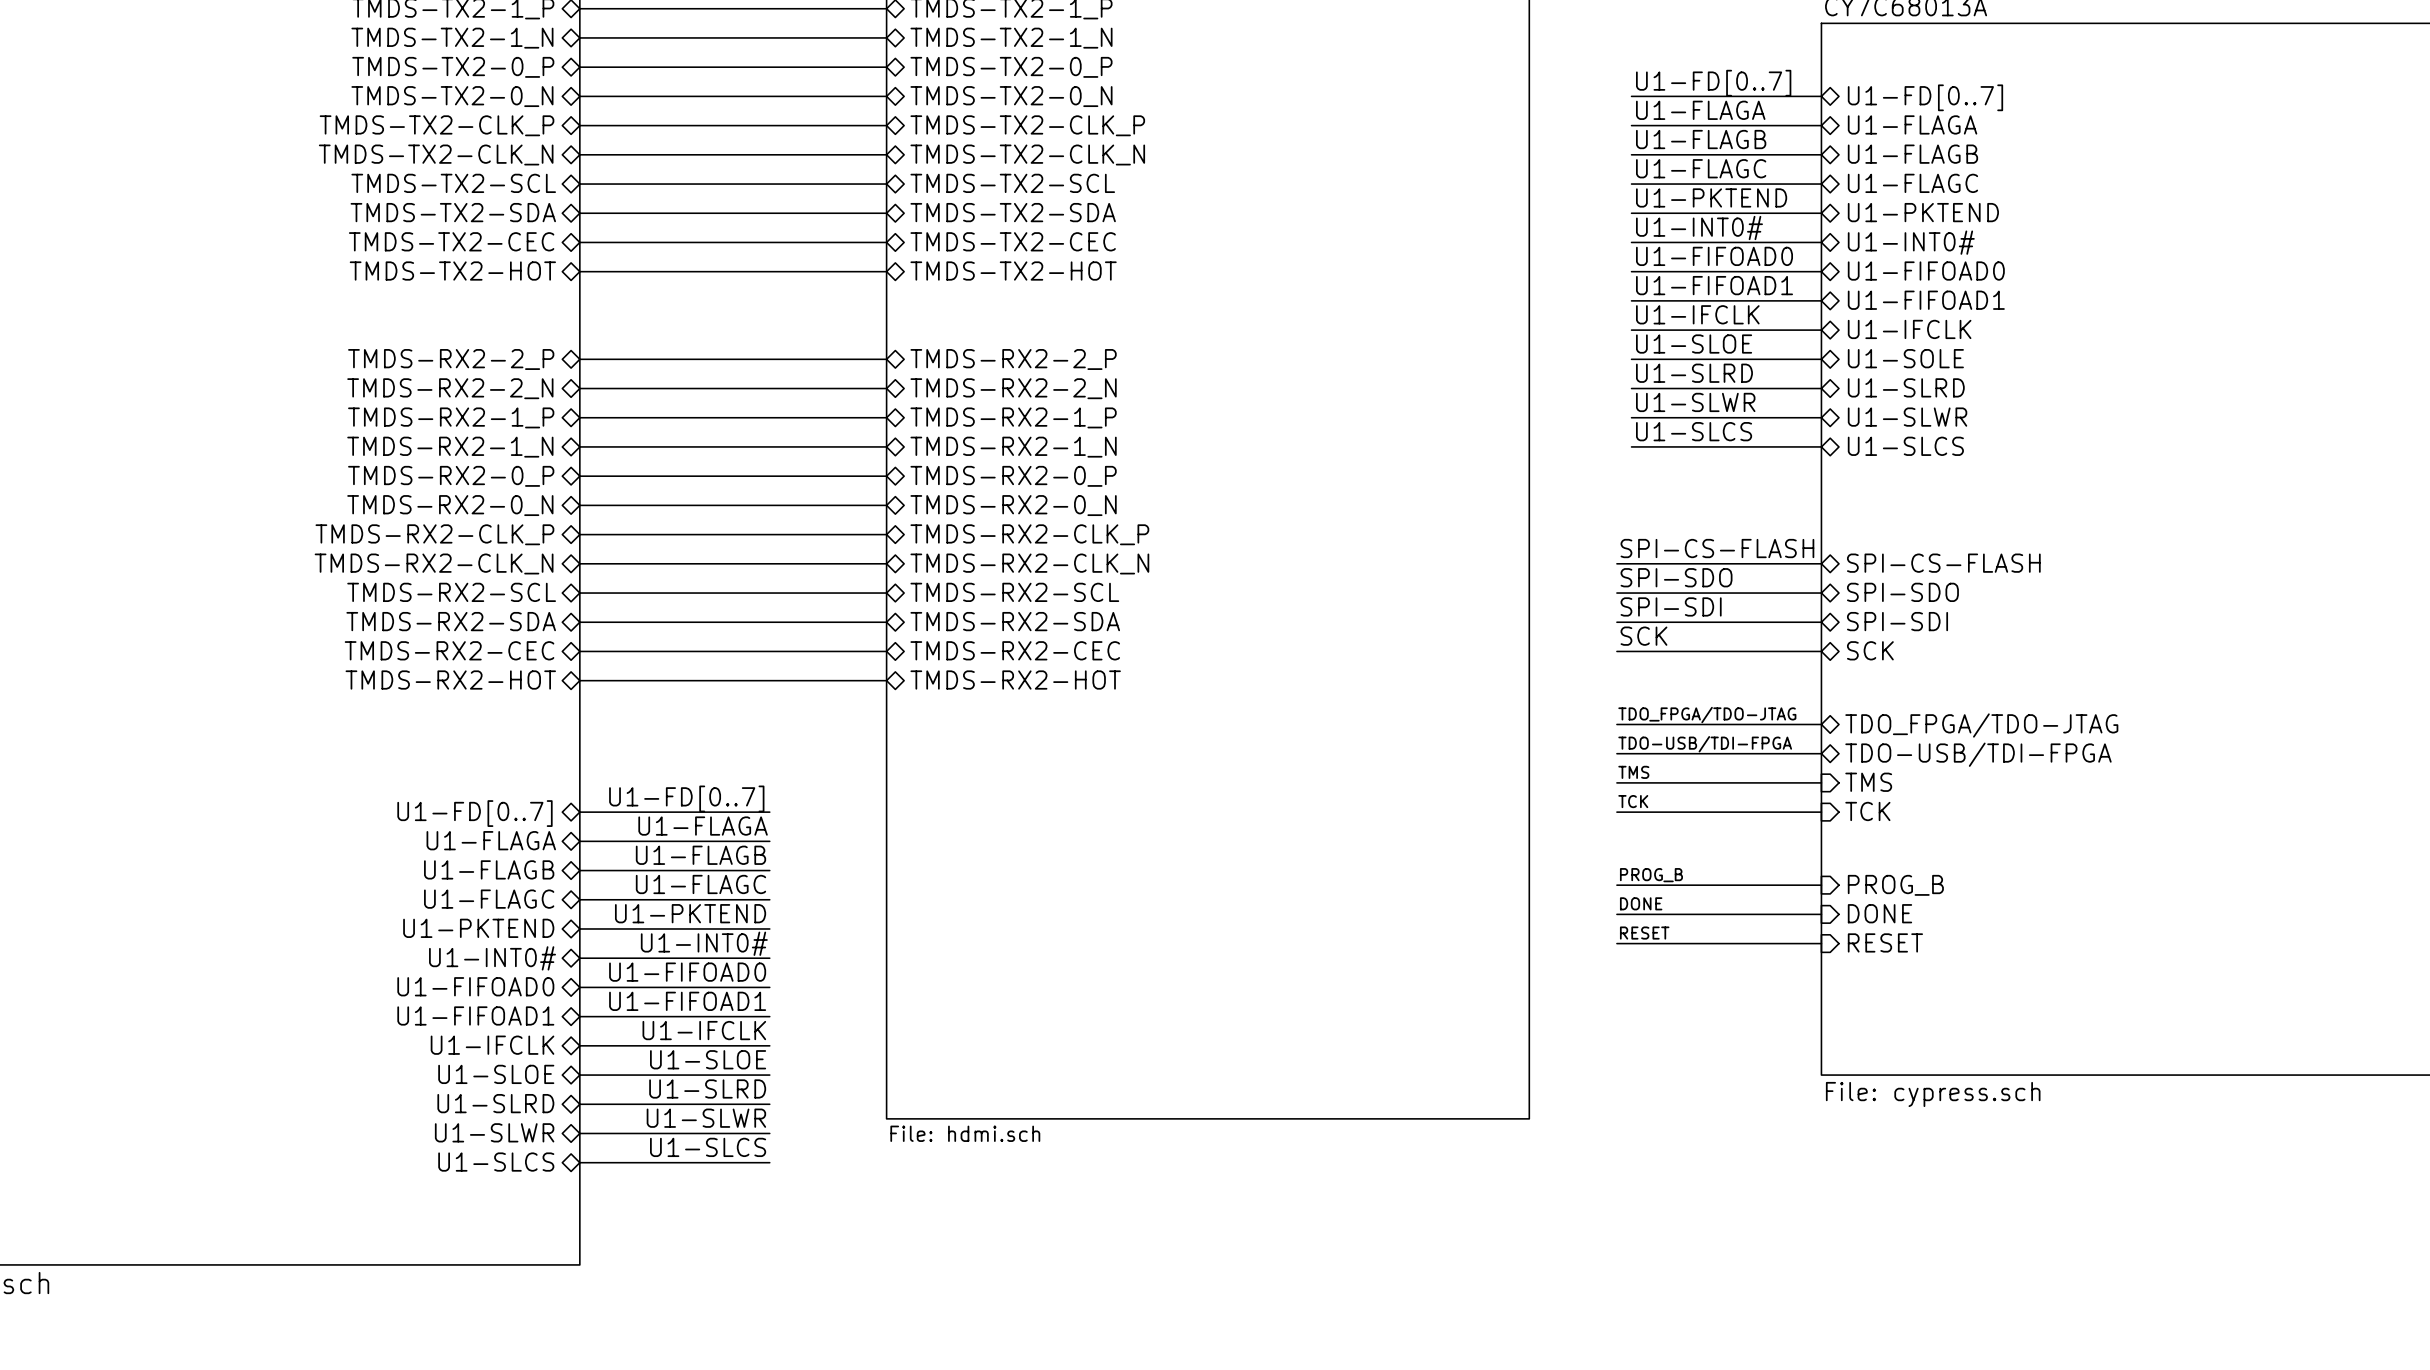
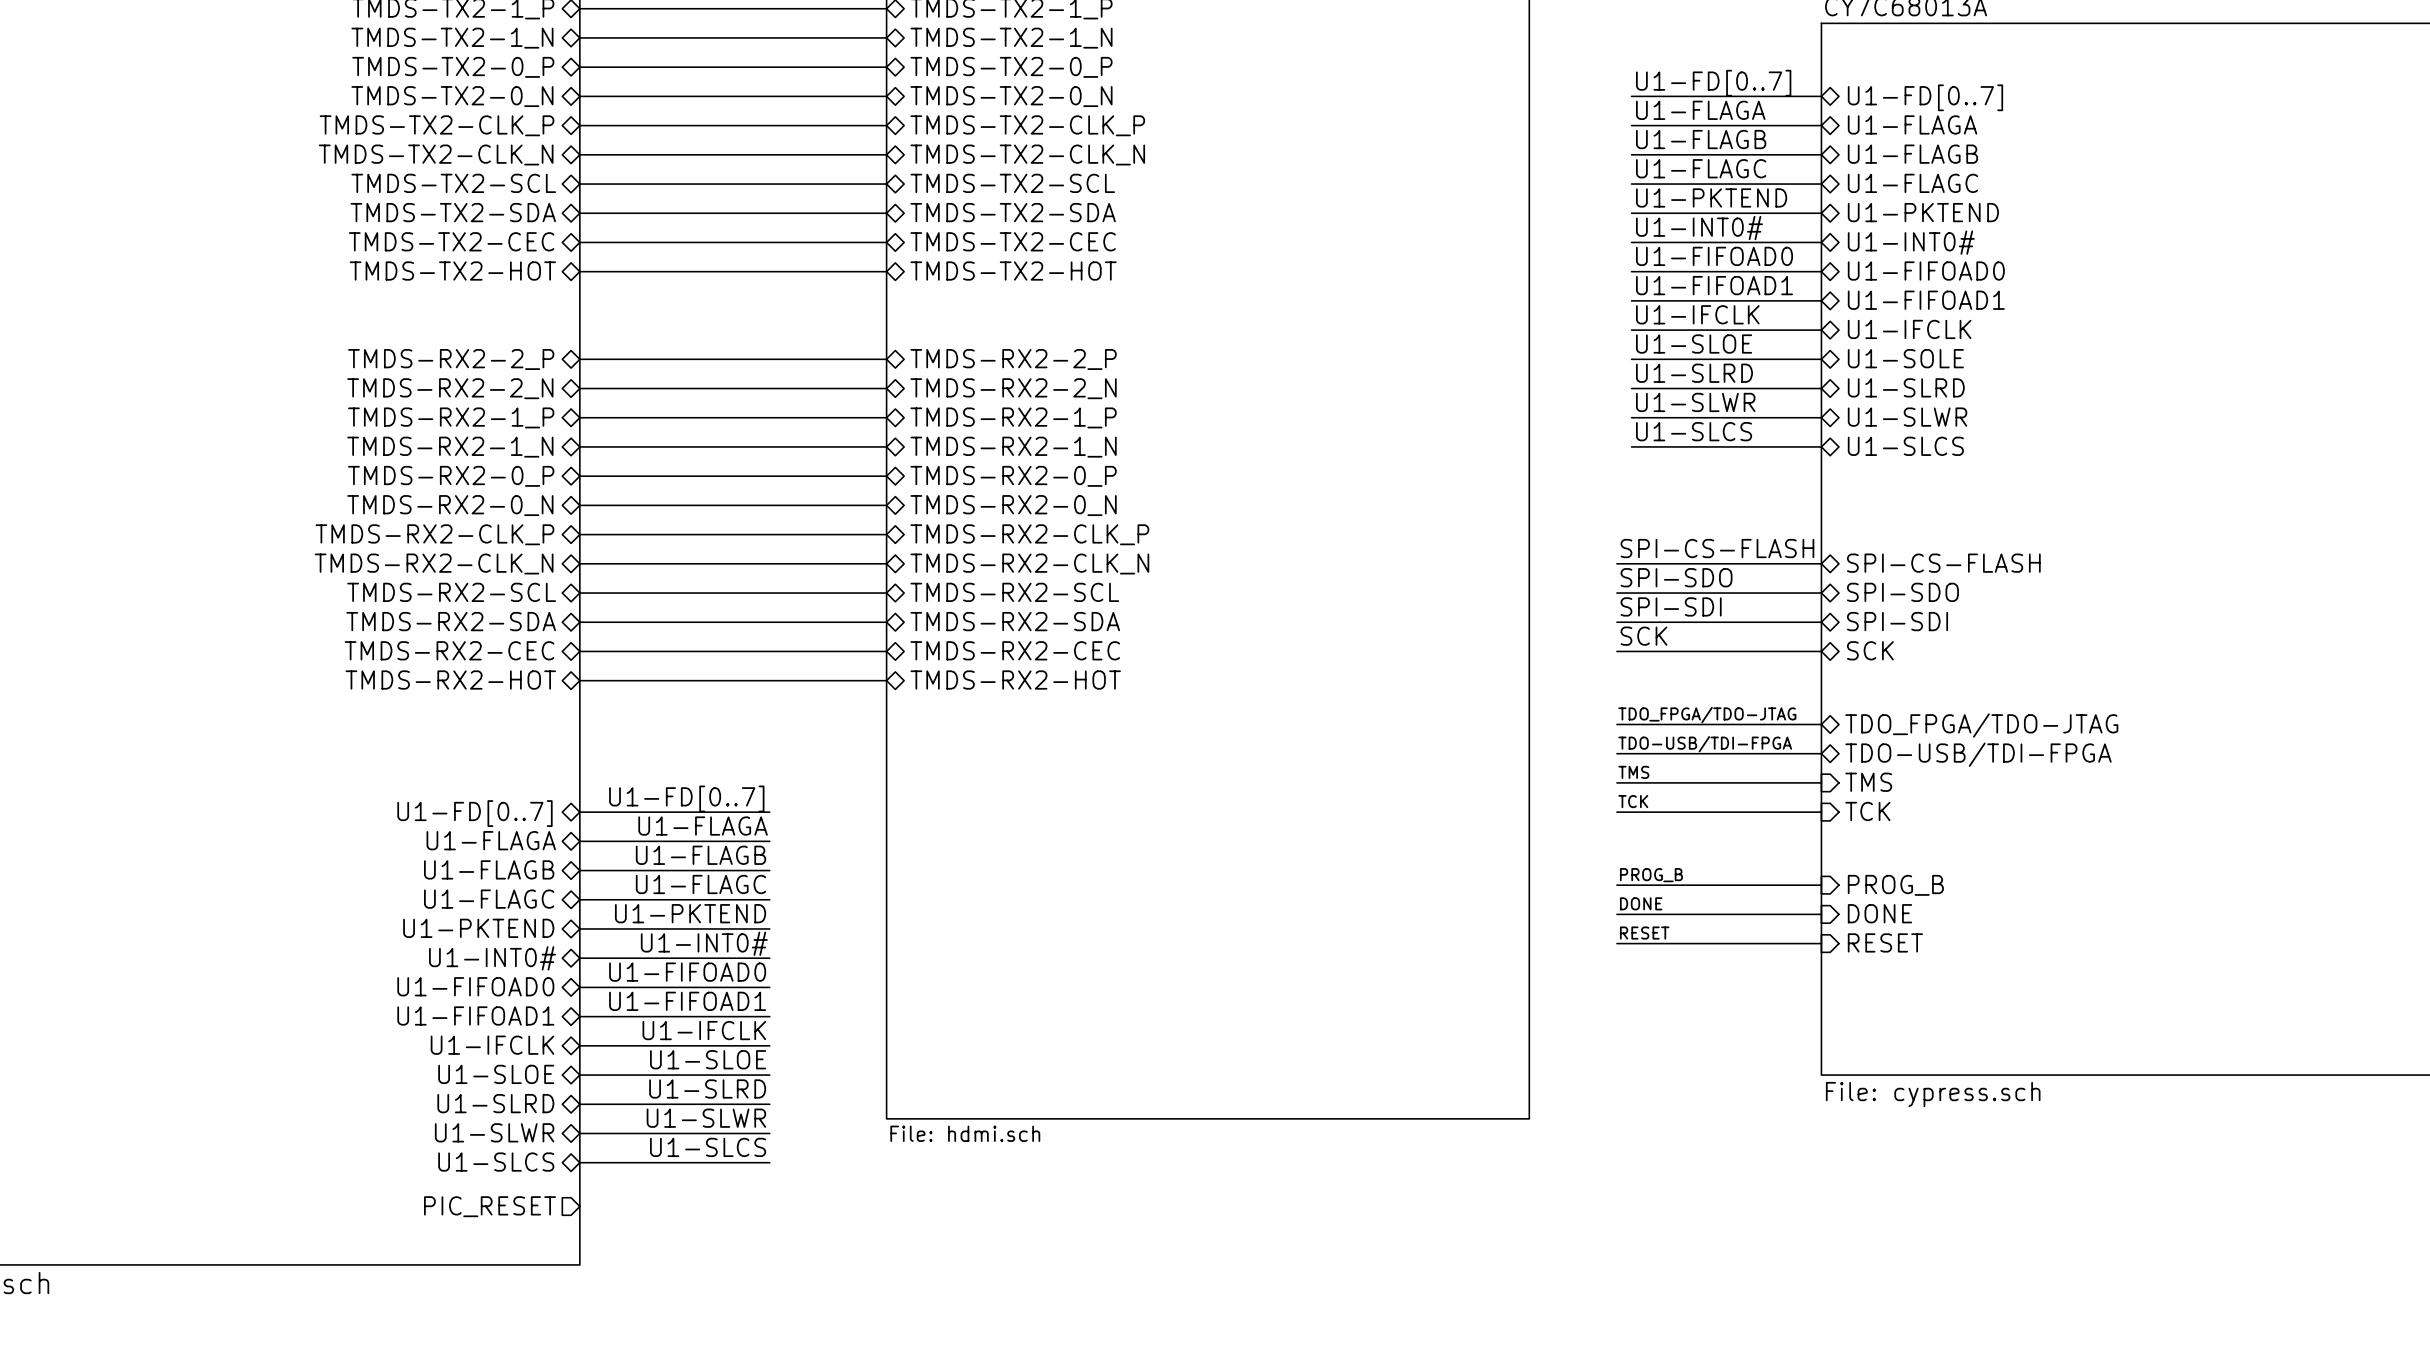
sheet pin: none -> PIC_RESET (490, 1206)

